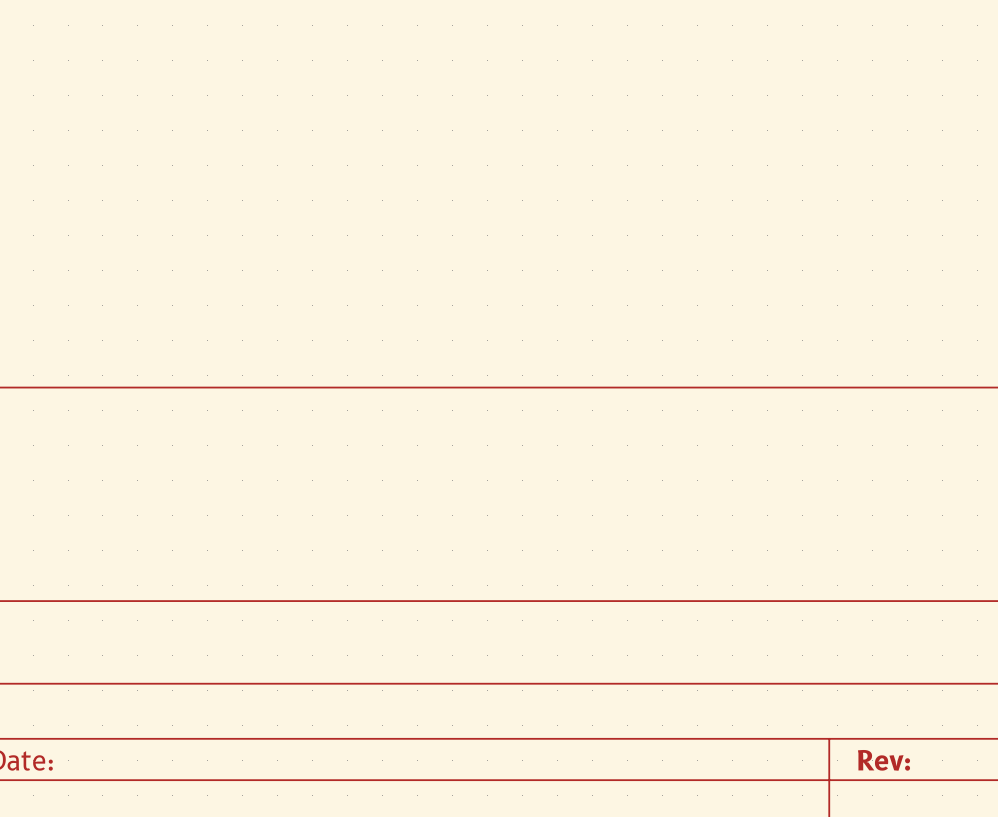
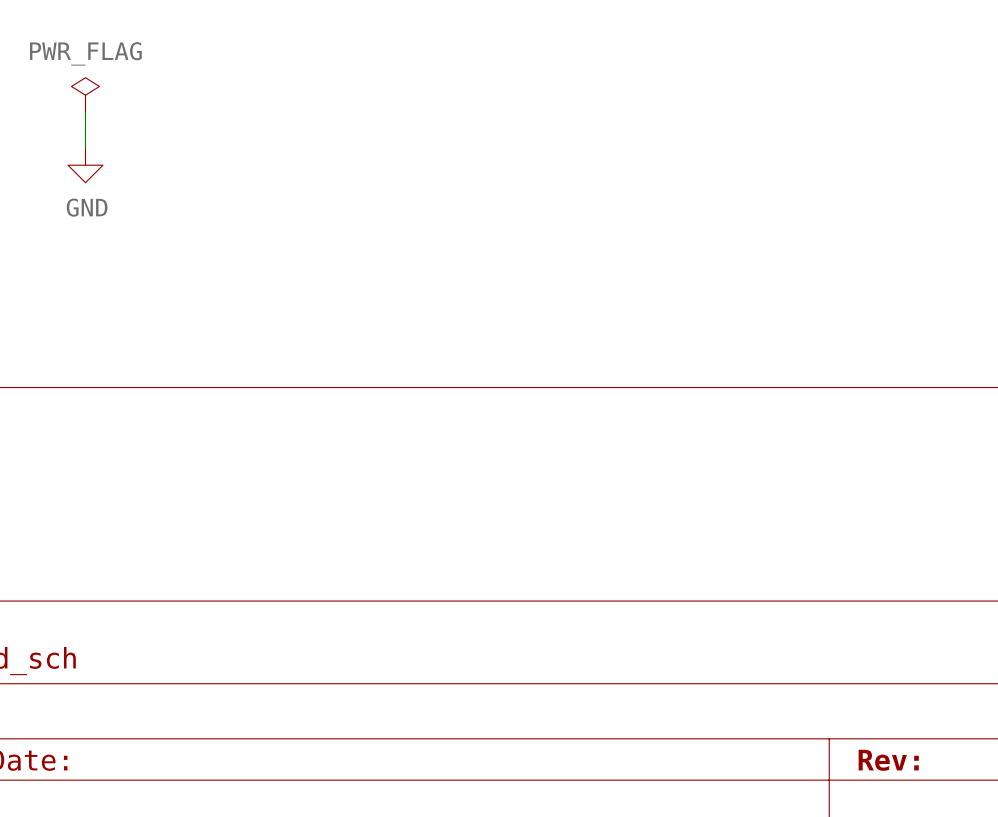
power symbol: none -> PWR_FLAG (85, 95)
wire: none -> (85, 112) (85, 147)
power symbol: none -> GND (85, 165)

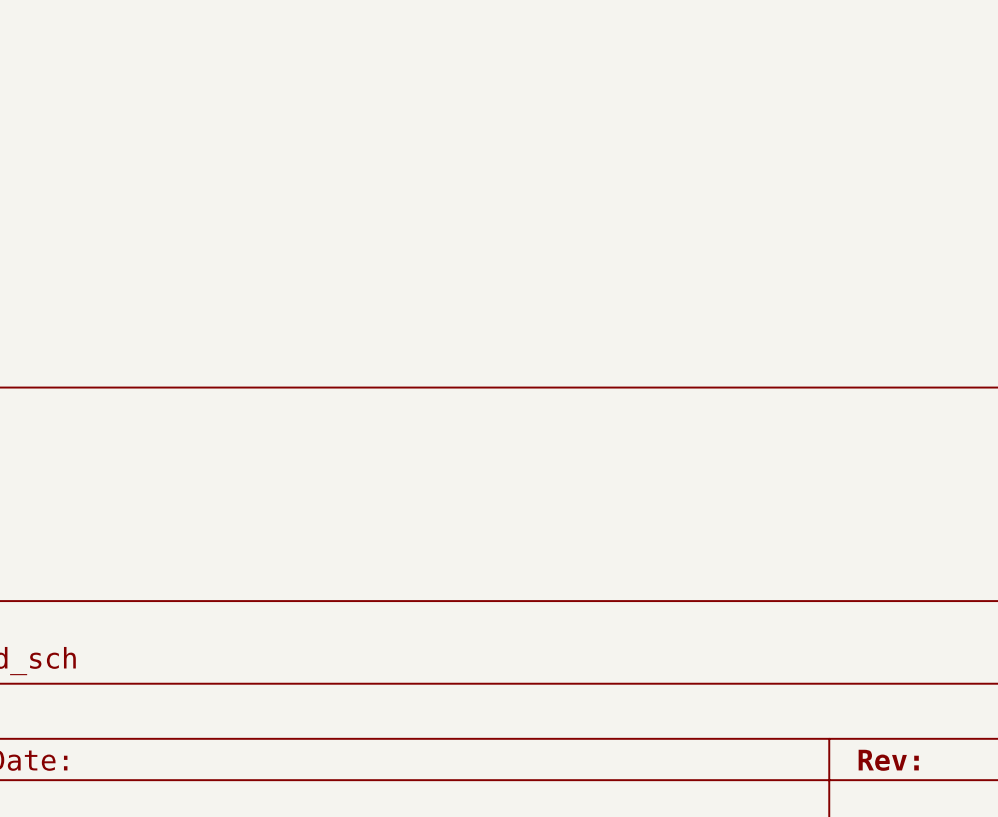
power symbol: PWR_FLAG (85, 95) -> none
wire: (85, 112) (85, 147) -> none
power symbol: GND (85, 165) -> none

